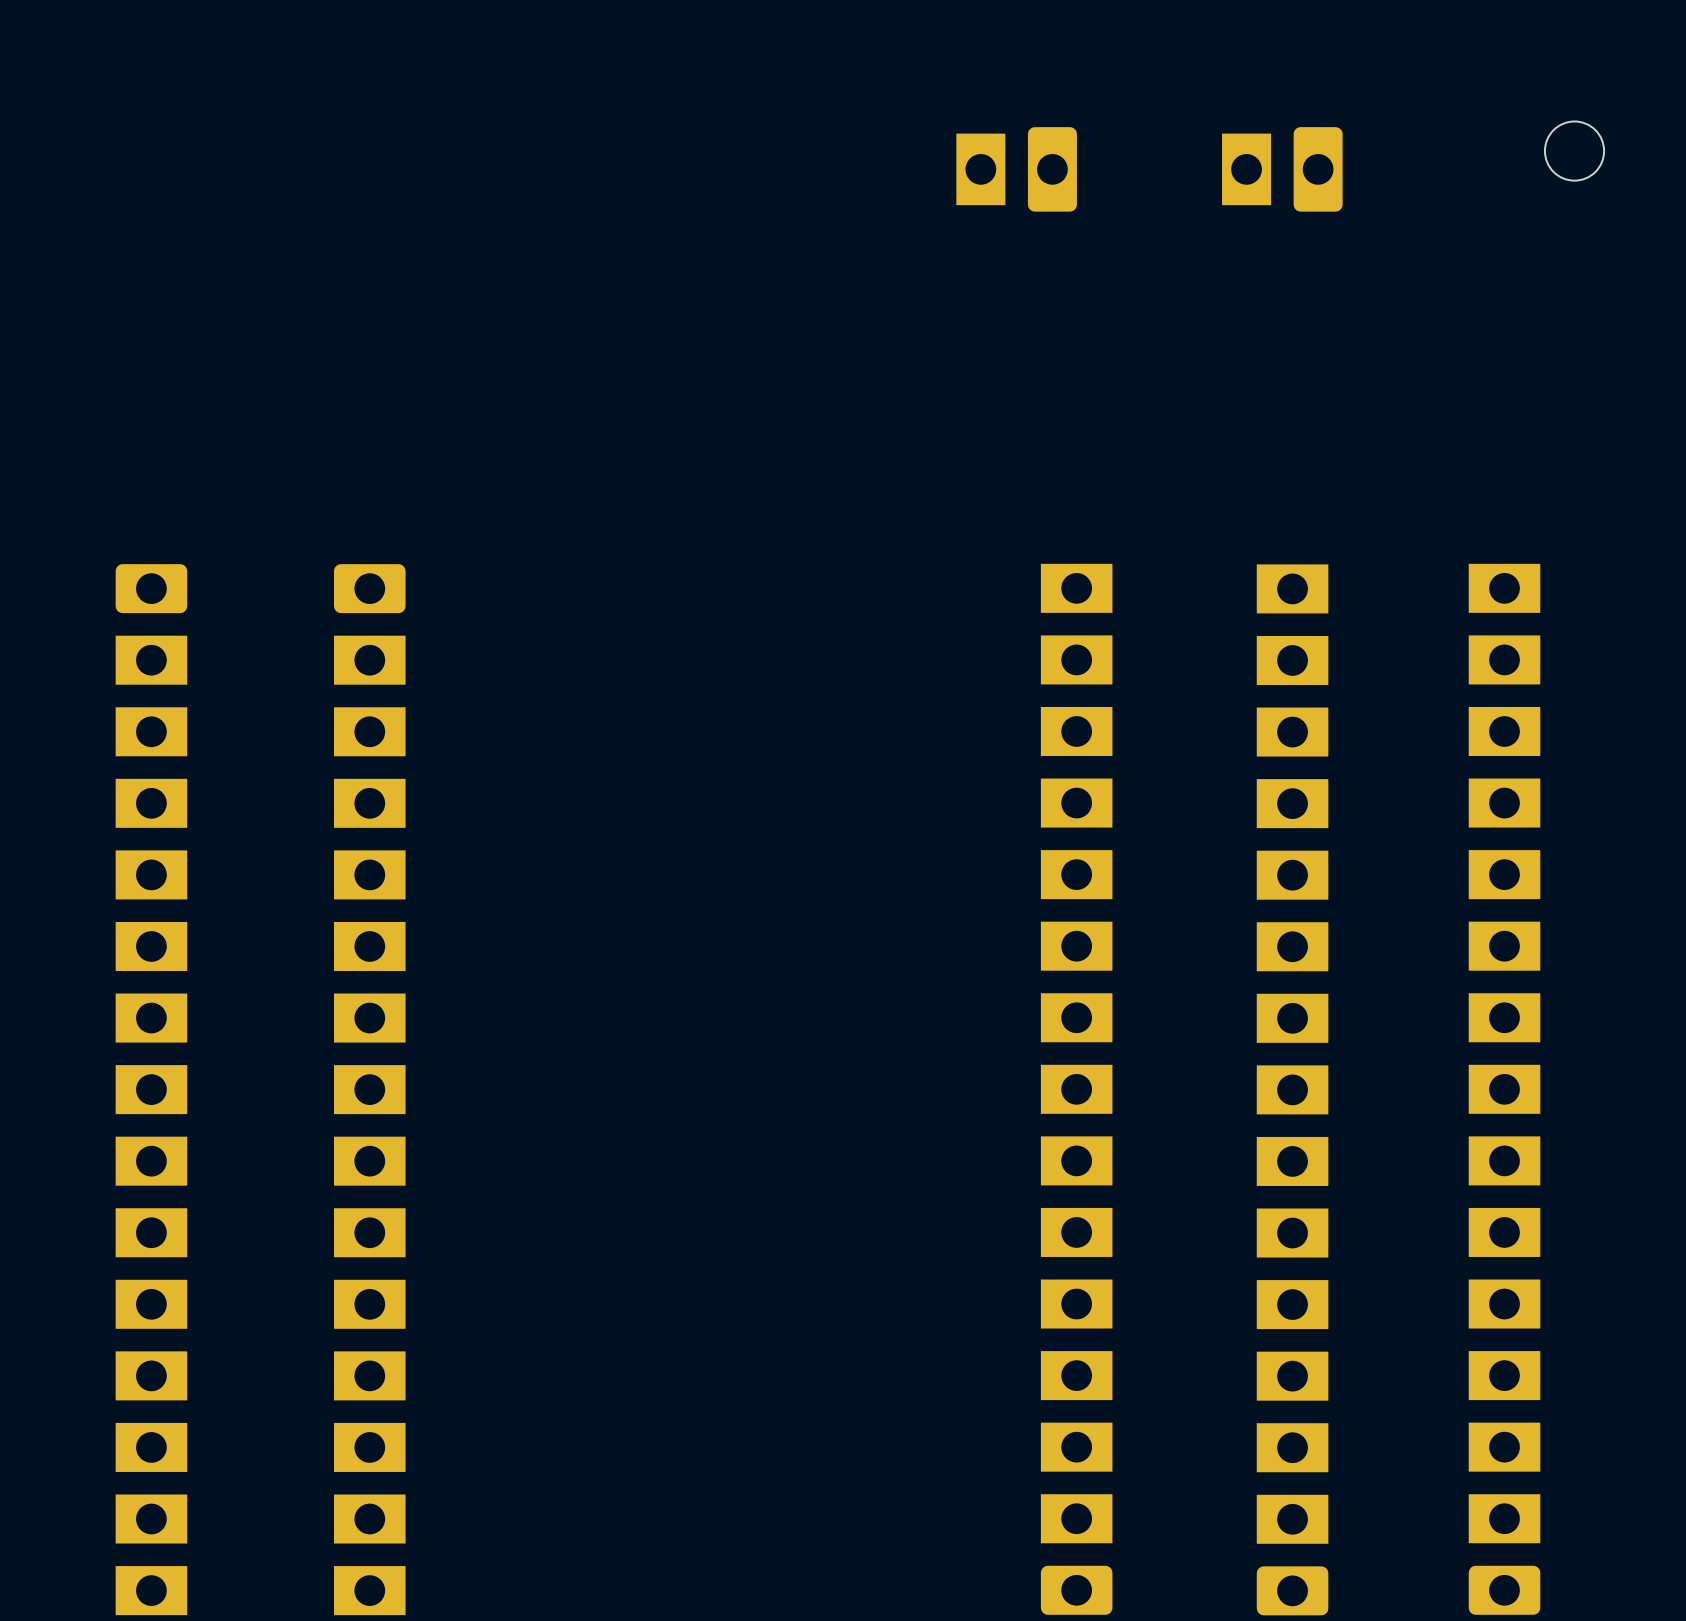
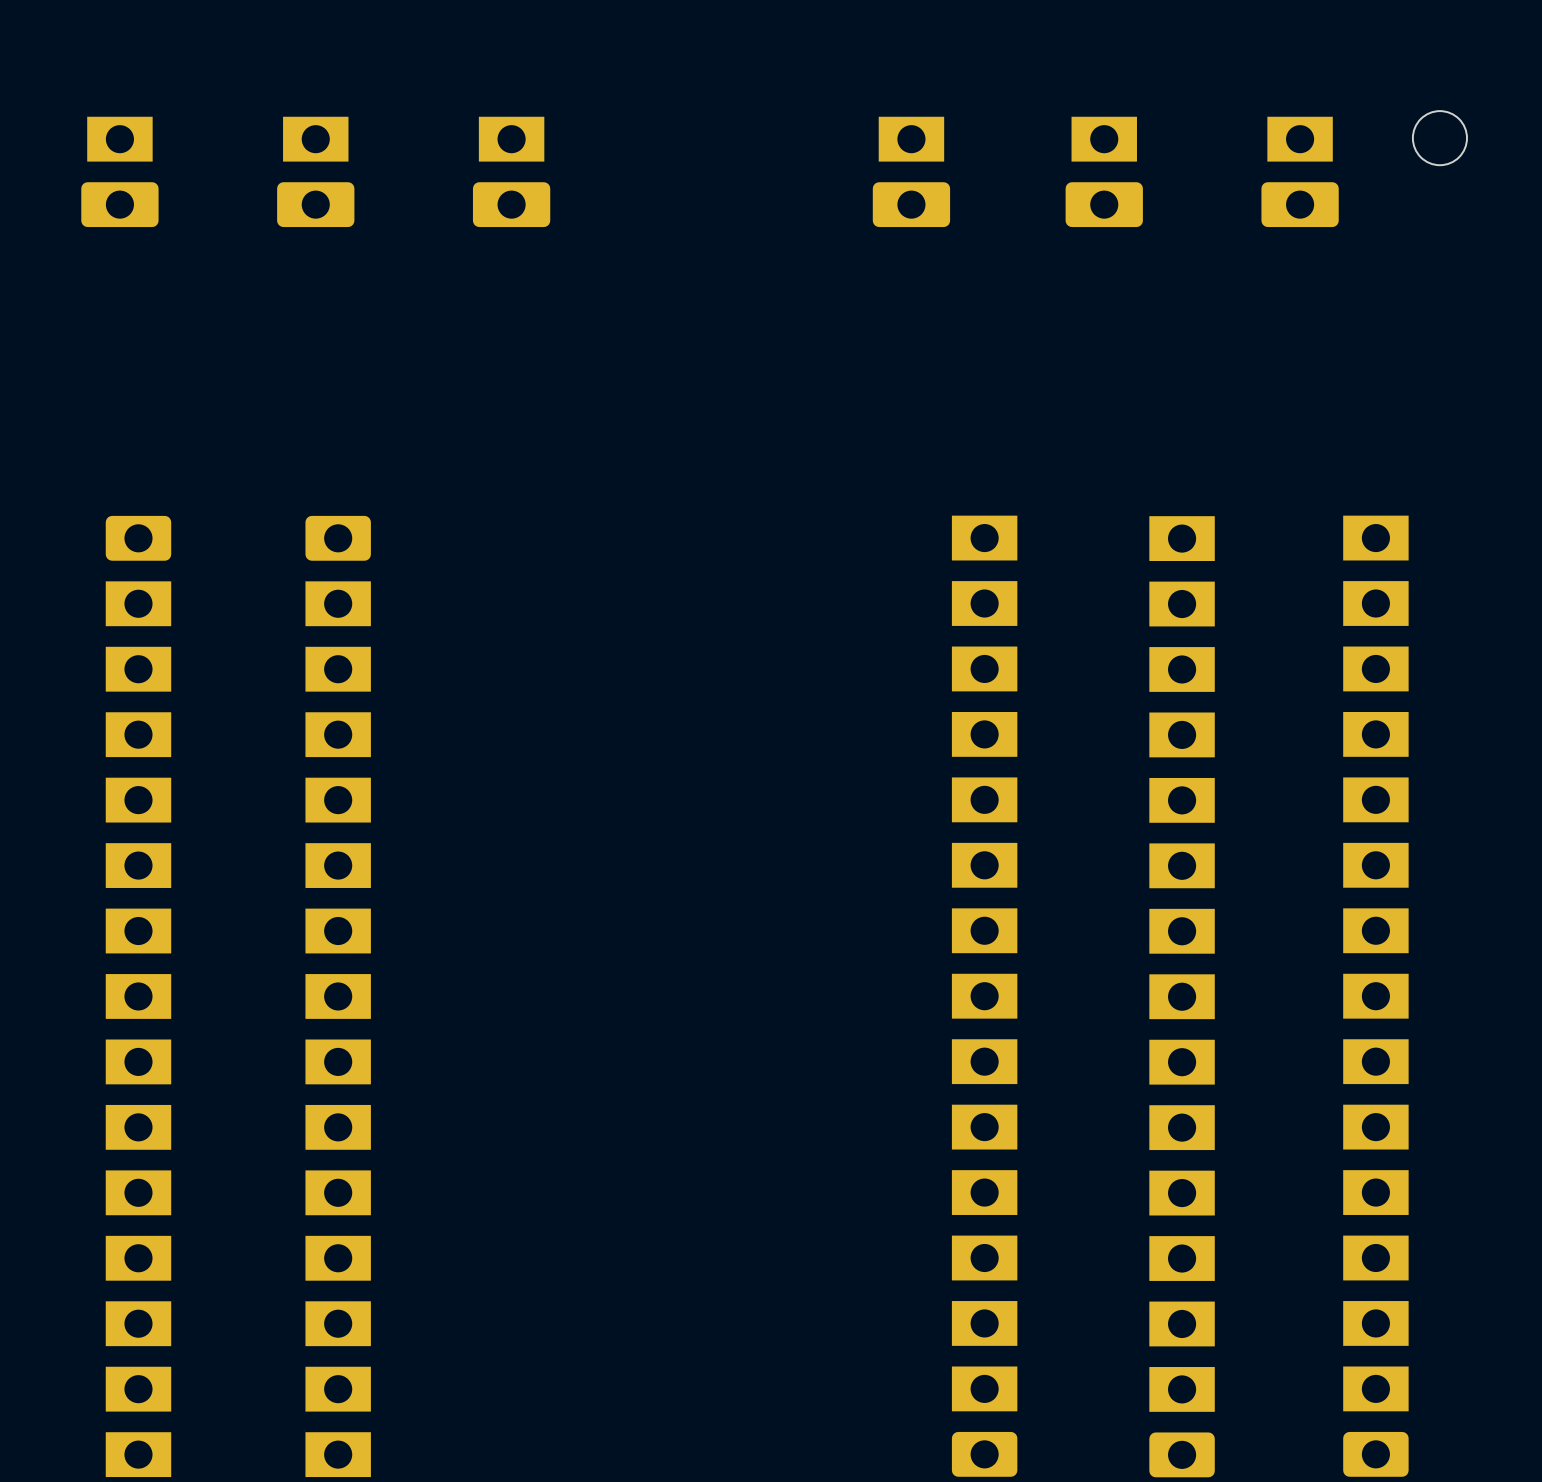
part rotation: 0° (1016, 169) -> 90° clockwise (911, 171)
part: (1282, 169) -> none
part: none -> (119, 171)
part: none -> (315, 171)
part: none -> (511, 171)
part: none -> (1104, 171)
part: none -> (1300, 171)

